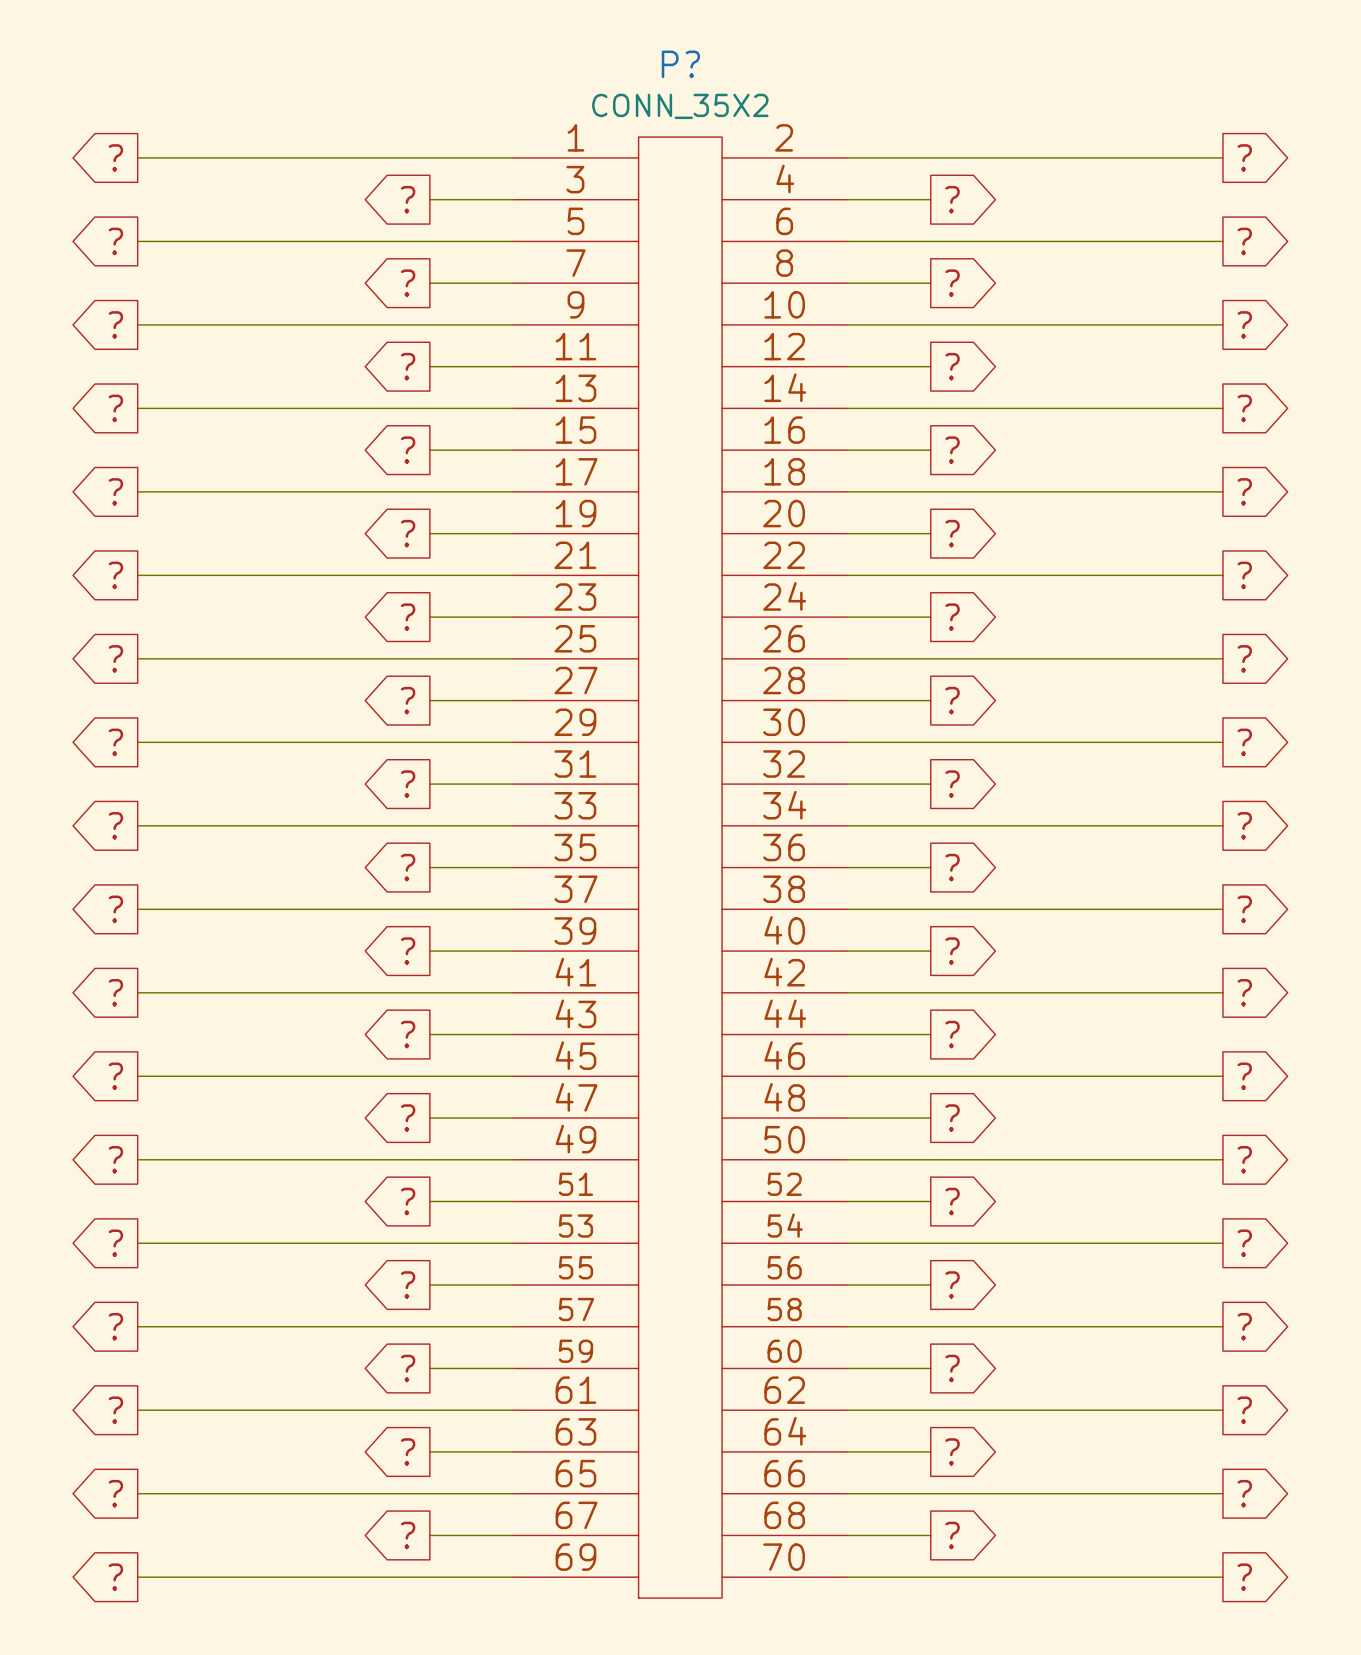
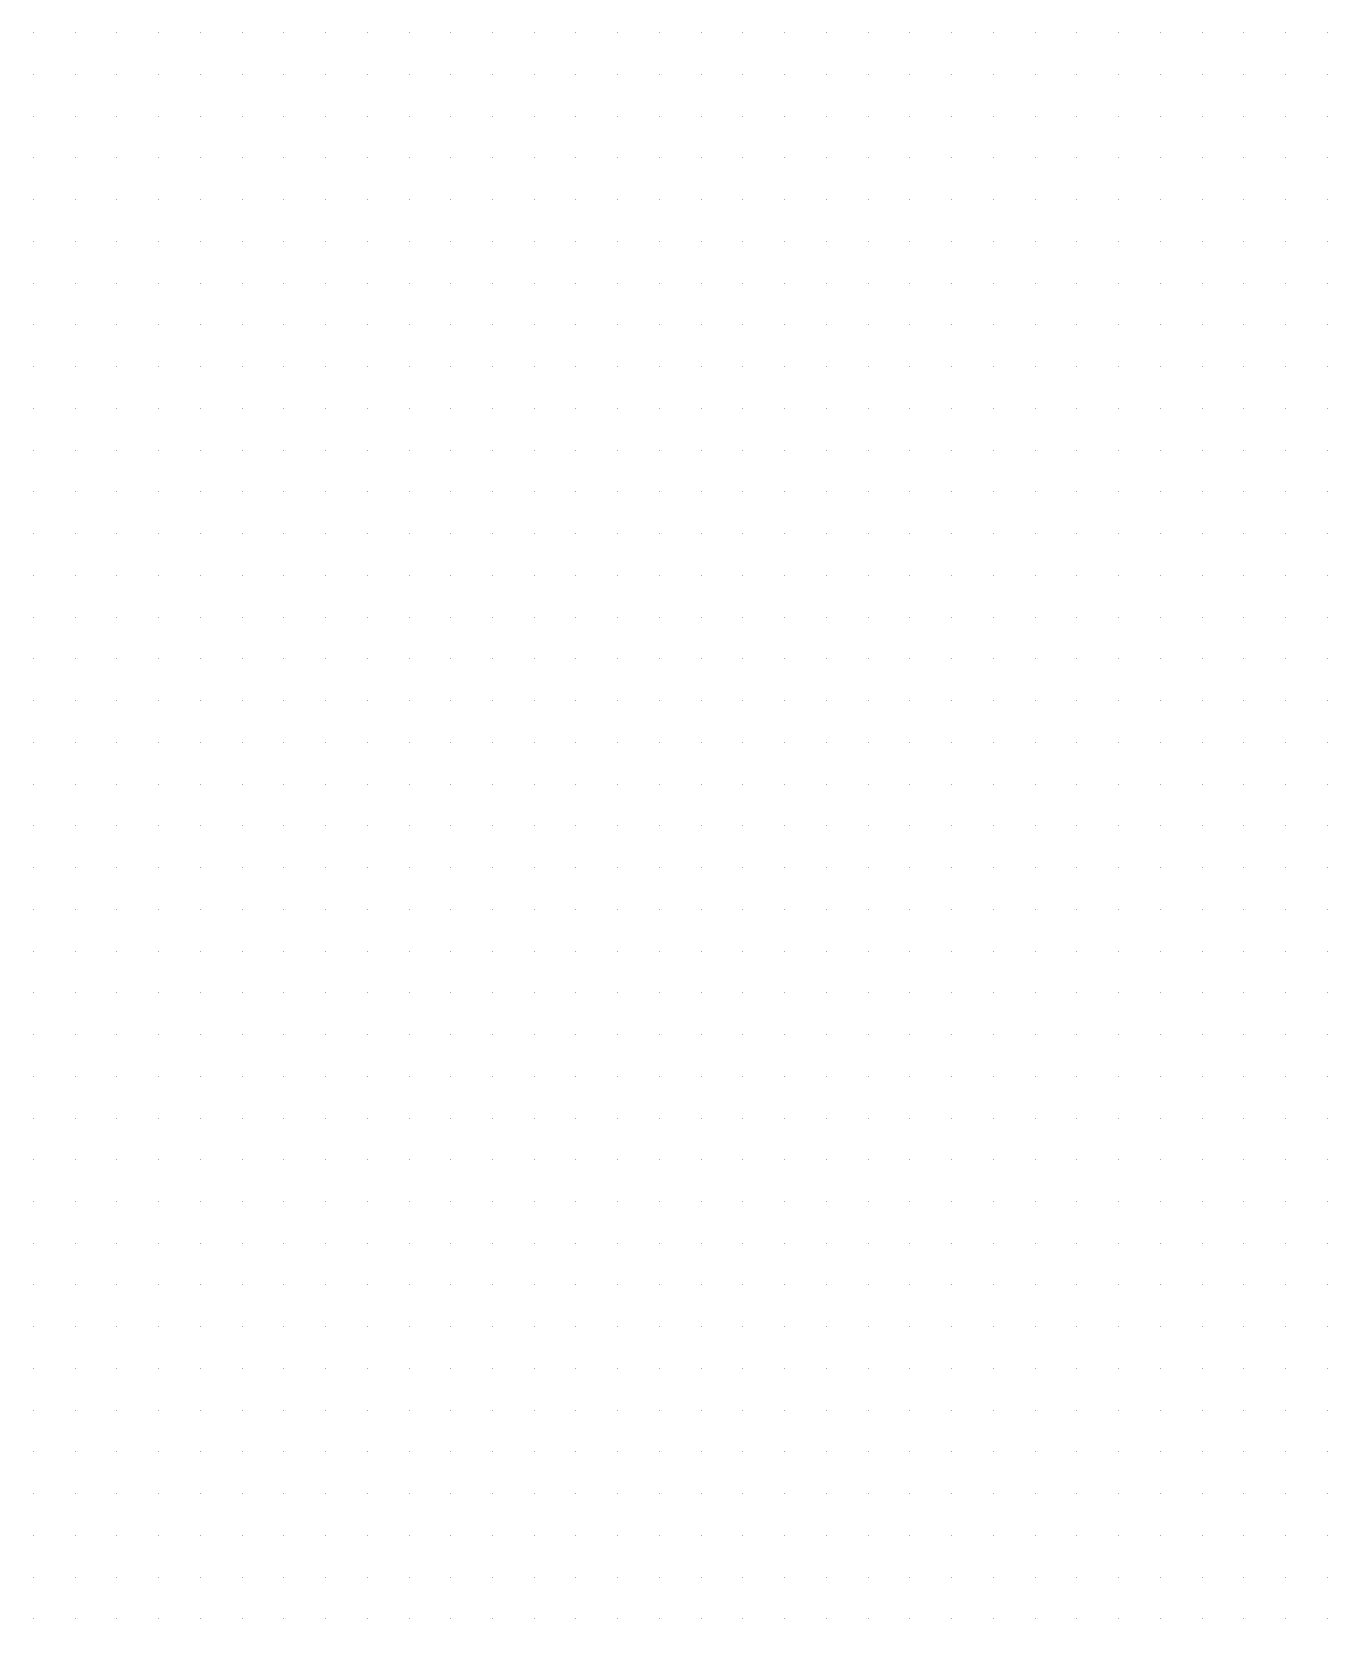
global label: ? (115, 157) -> none
wire: (137, 157) (513, 157) -> none
wire: (847, 157) (1222, 157) -> none
global label: ? (1244, 157) -> none
global label: ? (408, 199) -> none
wire: (429, 199) (513, 199) -> none
wire: (847, 199) (930, 199) -> none
global label: ? (952, 199) -> none
global label: ? (115, 241) -> none
wire: (137, 241) (513, 241) -> none
wire: (847, 241) (1222, 241) -> none
global label: ? (1244, 241) -> none
global label: ? (408, 283) -> none
wire: (429, 283) (513, 283) -> none
wire: (847, 283) (930, 283) -> none
global label: ? (952, 283) -> none
global label: ? (115, 324) -> none
wire: (137, 324) (513, 324) -> none
wire: (847, 324) (1222, 324) -> none
global label: ? (1244, 324) -> none
global label: ? (408, 366) -> none
wire: (429, 366) (513, 366) -> none
wire: (847, 366) (930, 366) -> none
global label: ? (952, 366) -> none
global label: ? (115, 408) -> none
wire: (137, 408) (513, 408) -> none
wire: (847, 408) (1222, 408) -> none
global label: ? (1244, 408) -> none
global label: ? (408, 450) -> none
wire: (429, 450) (513, 450) -> none
wire: (847, 450) (930, 450) -> none
global label: ? (952, 450) -> none
global label: ? (115, 491) -> none
wire: (137, 491) (513, 491) -> none
wire: (847, 491) (1222, 491) -> none
global label: ? (1244, 491) -> none
global label: ? (408, 533) -> none
wire: (429, 533) (513, 533) -> none
wire: (847, 533) (930, 533) -> none
global label: ? (952, 533) -> none
global label: ? (115, 575) -> none
wire: (137, 575) (513, 575) -> none
wire: (847, 575) (1222, 575) -> none
global label: ? (1244, 575) -> none
global label: ? (408, 617) -> none
wire: (429, 617) (513, 617) -> none
wire: (847, 617) (930, 617) -> none
global label: ? (952, 617) -> none
global label: ? (115, 658) -> none
wire: (137, 658) (513, 658) -> none
wire: (847, 658) (1222, 658) -> none
global label: ? (1244, 658) -> none
global label: ? (408, 700) -> none
wire: (429, 700) (513, 700) -> none
wire: (847, 700) (930, 700) -> none
global label: ? (952, 700) -> none
global label: ? (115, 742) -> none
wire: (137, 742) (513, 742) -> none
wire: (847, 742) (1222, 742) -> none
global label: ? (1244, 742) -> none
global label: ? (408, 784) -> none
wire: (429, 784) (513, 784) -> none
wire: (847, 784) (930, 784) -> none
global label: ? (952, 784) -> none
global label: ? (115, 825) -> none
wire: (137, 825) (513, 825) -> none
wire: (847, 825) (1222, 825) -> none
global label: ? (1244, 825) -> none
global label: ? (408, 867) -> none
wire: (429, 867) (513, 867) -> none
P?: CONN_35X2 (680, 867) -> none
wire: (847, 867) (930, 867) -> none
global label: ? (952, 867) -> none
global label: ? (115, 909) -> none
wire: (137, 909) (513, 909) -> none
wire: (847, 909) (1222, 909) -> none
global label: ? (1244, 909) -> none
global label: ? (408, 951) -> none
wire: (429, 951) (513, 951) -> none
wire: (847, 951) (930, 951) -> none
global label: ? (952, 951) -> none
global label: ? (115, 992) -> none
wire: (137, 992) (513, 992) -> none
wire: (847, 992) (1222, 992) -> none
global label: ? (1244, 992) -> none
global label: ? (408, 1034) -> none
wire: (429, 1034) (513, 1034) -> none
wire: (847, 1034) (930, 1034) -> none
global label: ? (952, 1034) -> none
global label: ? (115, 1076) -> none
wire: (137, 1076) (513, 1076) -> none
wire: (847, 1076) (1222, 1076) -> none
global label: ? (1244, 1076) -> none
global label: ? (408, 1118) -> none
wire: (429, 1118) (513, 1118) -> none
wire: (847, 1118) (930, 1118) -> none
global label: ? (952, 1118) -> none
global label: ? (115, 1159) -> none
wire: (137, 1159) (513, 1159) -> none
wire: (847, 1159) (1222, 1159) -> none
global label: ? (1244, 1159) -> none
global label: ? (408, 1201) -> none
wire: (429, 1201) (513, 1201) -> none
wire: (847, 1201) (930, 1201) -> none
global label: ? (952, 1201) -> none
global label: ? (115, 1243) -> none
wire: (137, 1243) (513, 1243) -> none
wire: (847, 1243) (1222, 1243) -> none
global label: ? (1244, 1243) -> none
global label: ? (408, 1284) -> none
wire: (429, 1284) (513, 1284) -> none
wire: (847, 1284) (930, 1284) -> none
global label: ? (952, 1284) -> none
global label: ? (115, 1326) -> none
wire: (137, 1326) (513, 1326) -> none
wire: (847, 1326) (1222, 1326) -> none
global label: ? (1244, 1326) -> none
global label: ? (408, 1368) -> none
wire: (429, 1368) (513, 1368) -> none
wire: (847, 1368) (930, 1368) -> none
global label: ? (952, 1368) -> none
global label: ? (115, 1410) -> none
wire: (137, 1410) (513, 1410) -> none
wire: (847, 1410) (1222, 1410) -> none
global label: ? (1244, 1410) -> none
global label: ? (408, 1451) -> none
wire: (429, 1451) (513, 1451) -> none
wire: (847, 1451) (930, 1451) -> none
global label: ? (952, 1451) -> none
global label: ? (115, 1493) -> none
wire: (137, 1493) (513, 1493) -> none
wire: (847, 1493) (1222, 1493) -> none
global label: ? (1244, 1493) -> none
global label: ? (408, 1535) -> none
wire: (429, 1535) (513, 1535) -> none
wire: (847, 1535) (930, 1535) -> none
global label: ? (952, 1535) -> none
global label: ? (115, 1577) -> none
wire: (137, 1577) (513, 1577) -> none
wire: (847, 1577) (1222, 1577) -> none
global label: ? (1244, 1577) -> none

